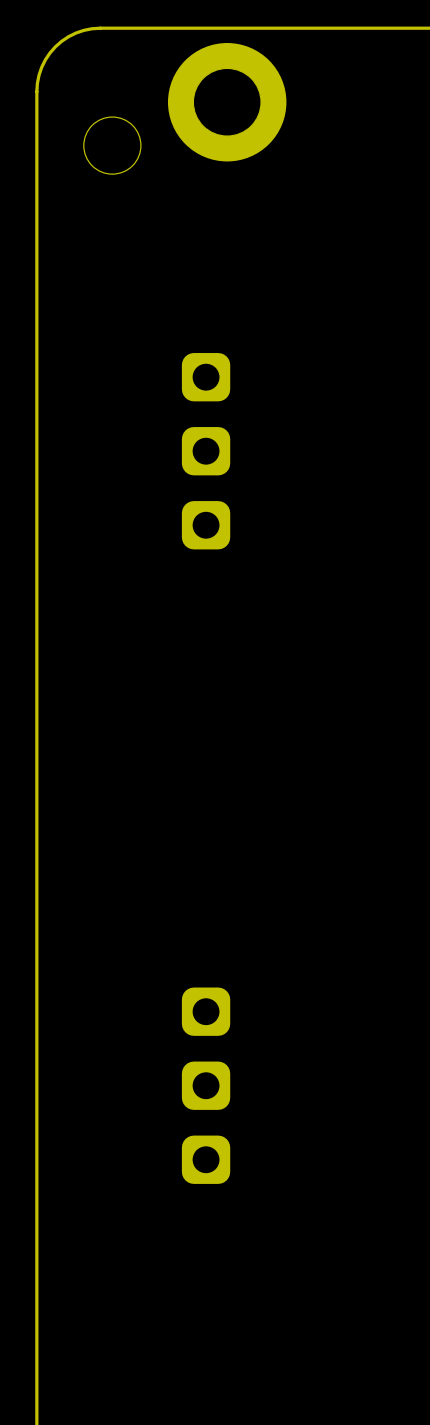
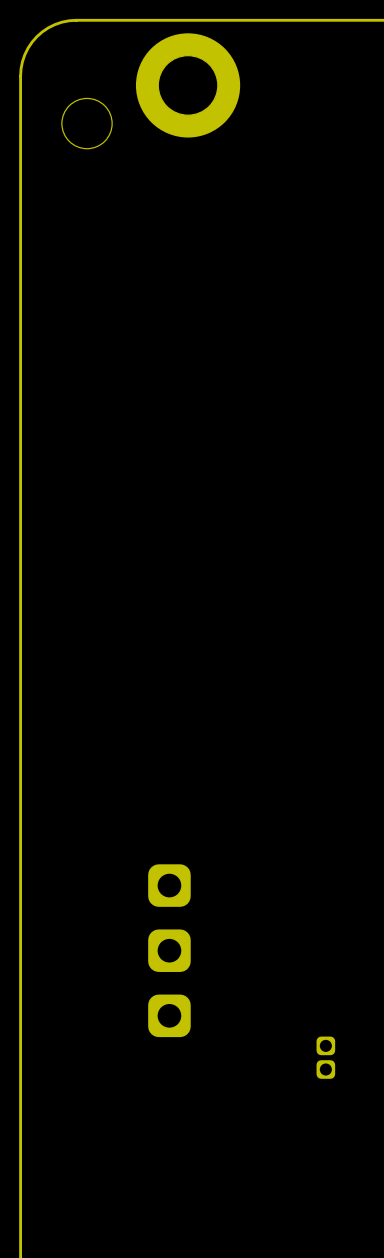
part: (206, 451) -> none
part: none -> (325, 1057)

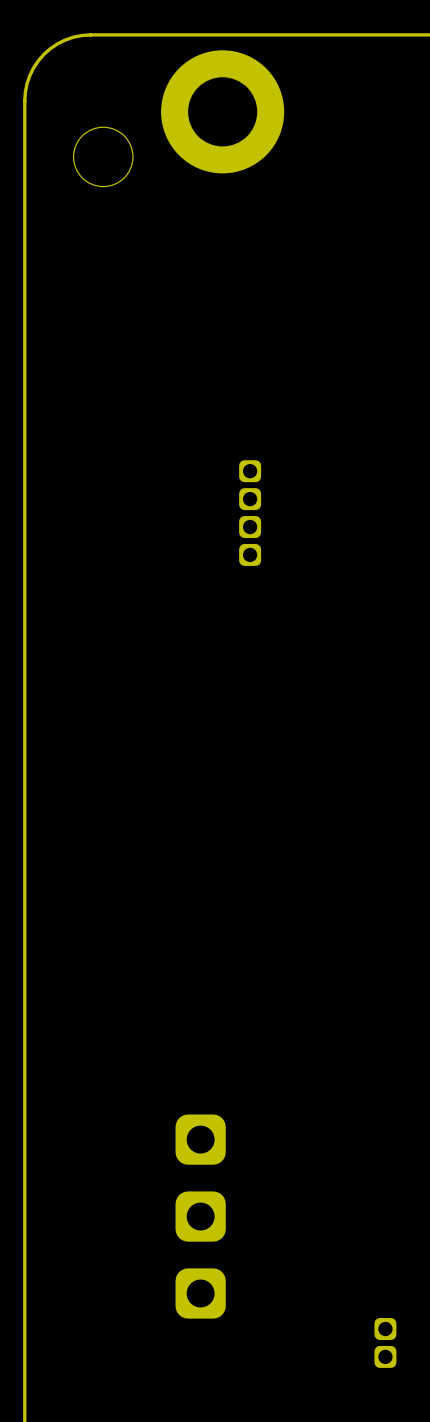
part: none -> (250, 513)
part position: (169, 950) -> (200, 1216)
part position: (325, 1057) -> (385, 1342)

